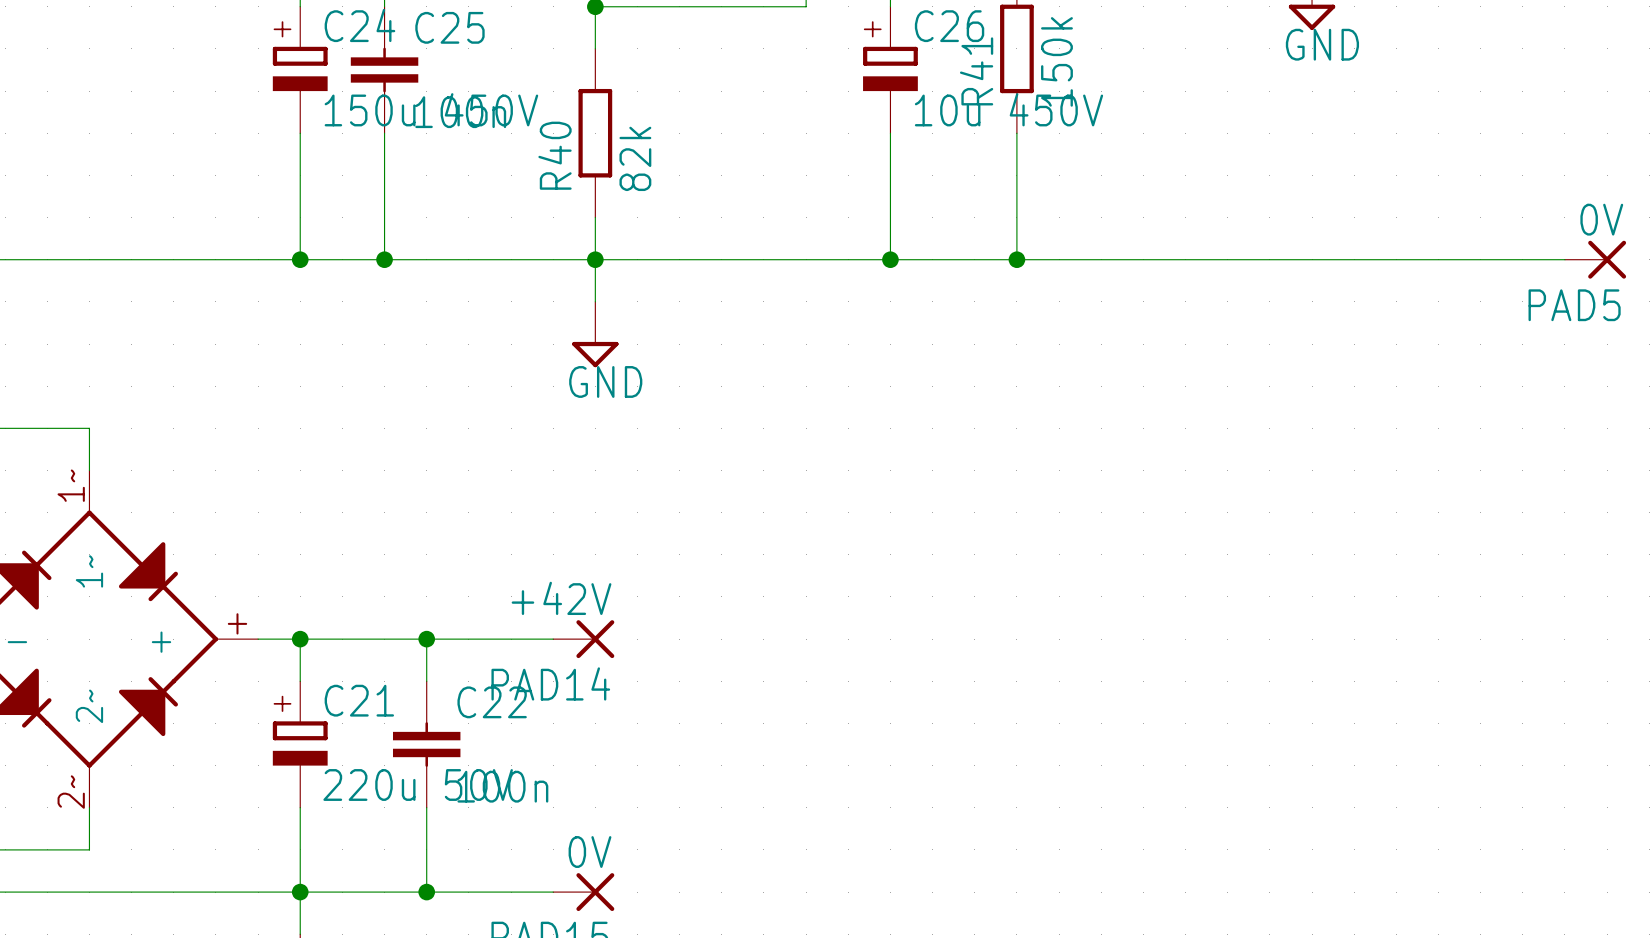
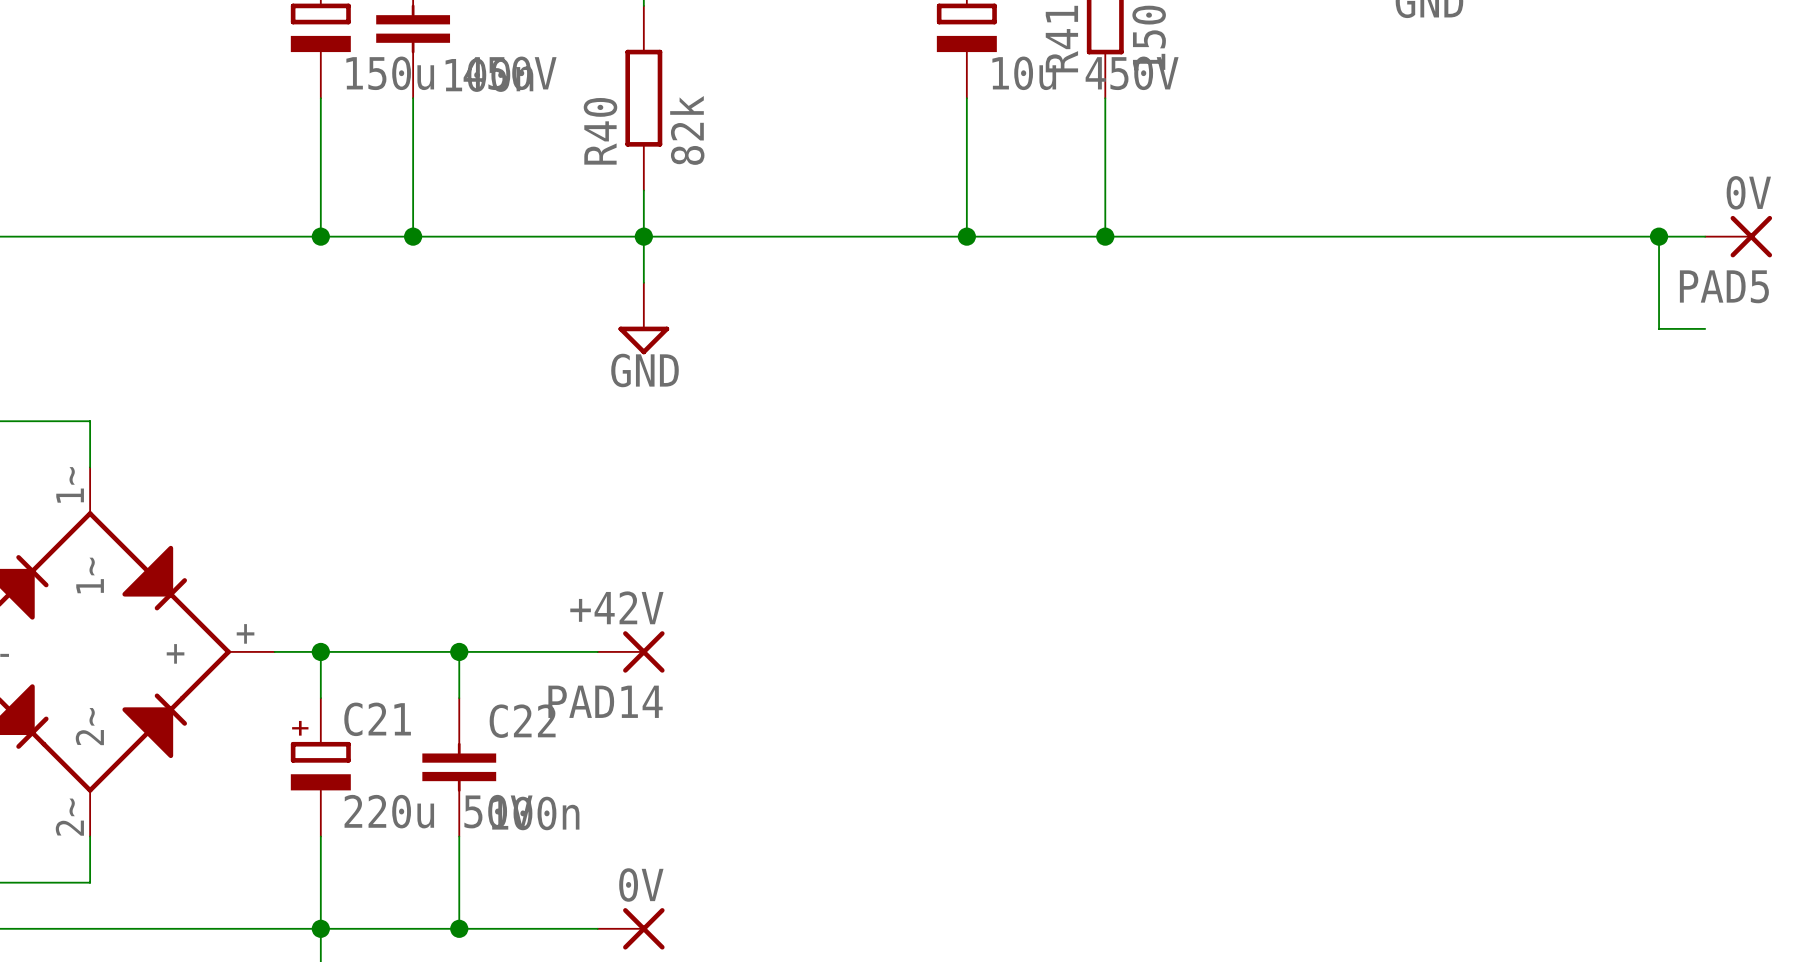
wire: none -> (1659, 236) (1659, 328) (1705, 328)
junction: none -> (1659, 236)

